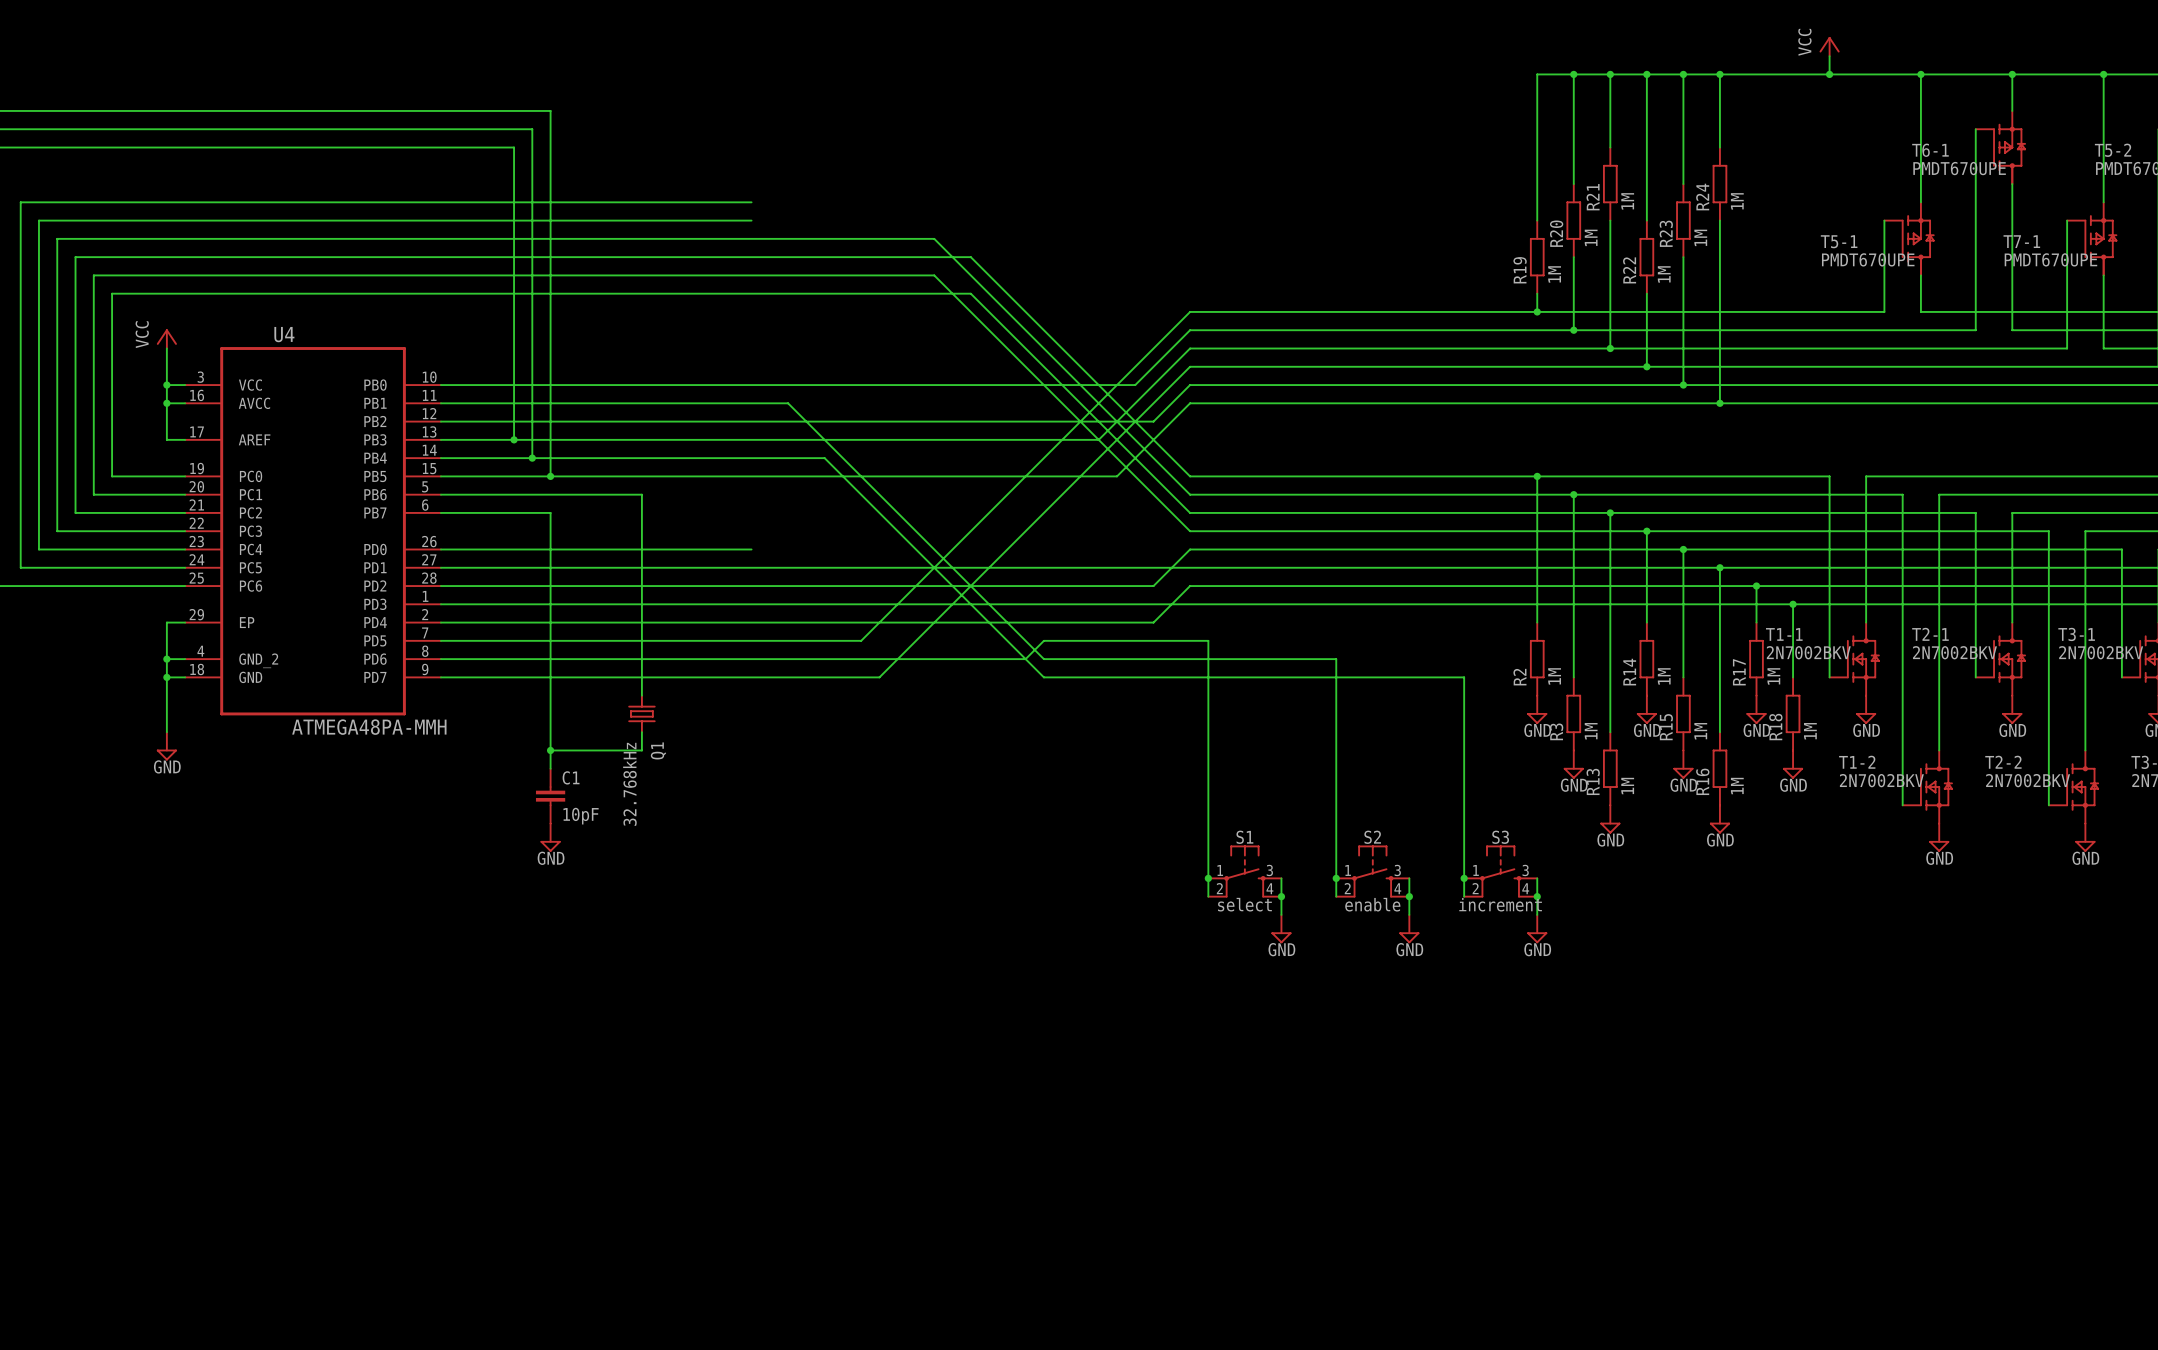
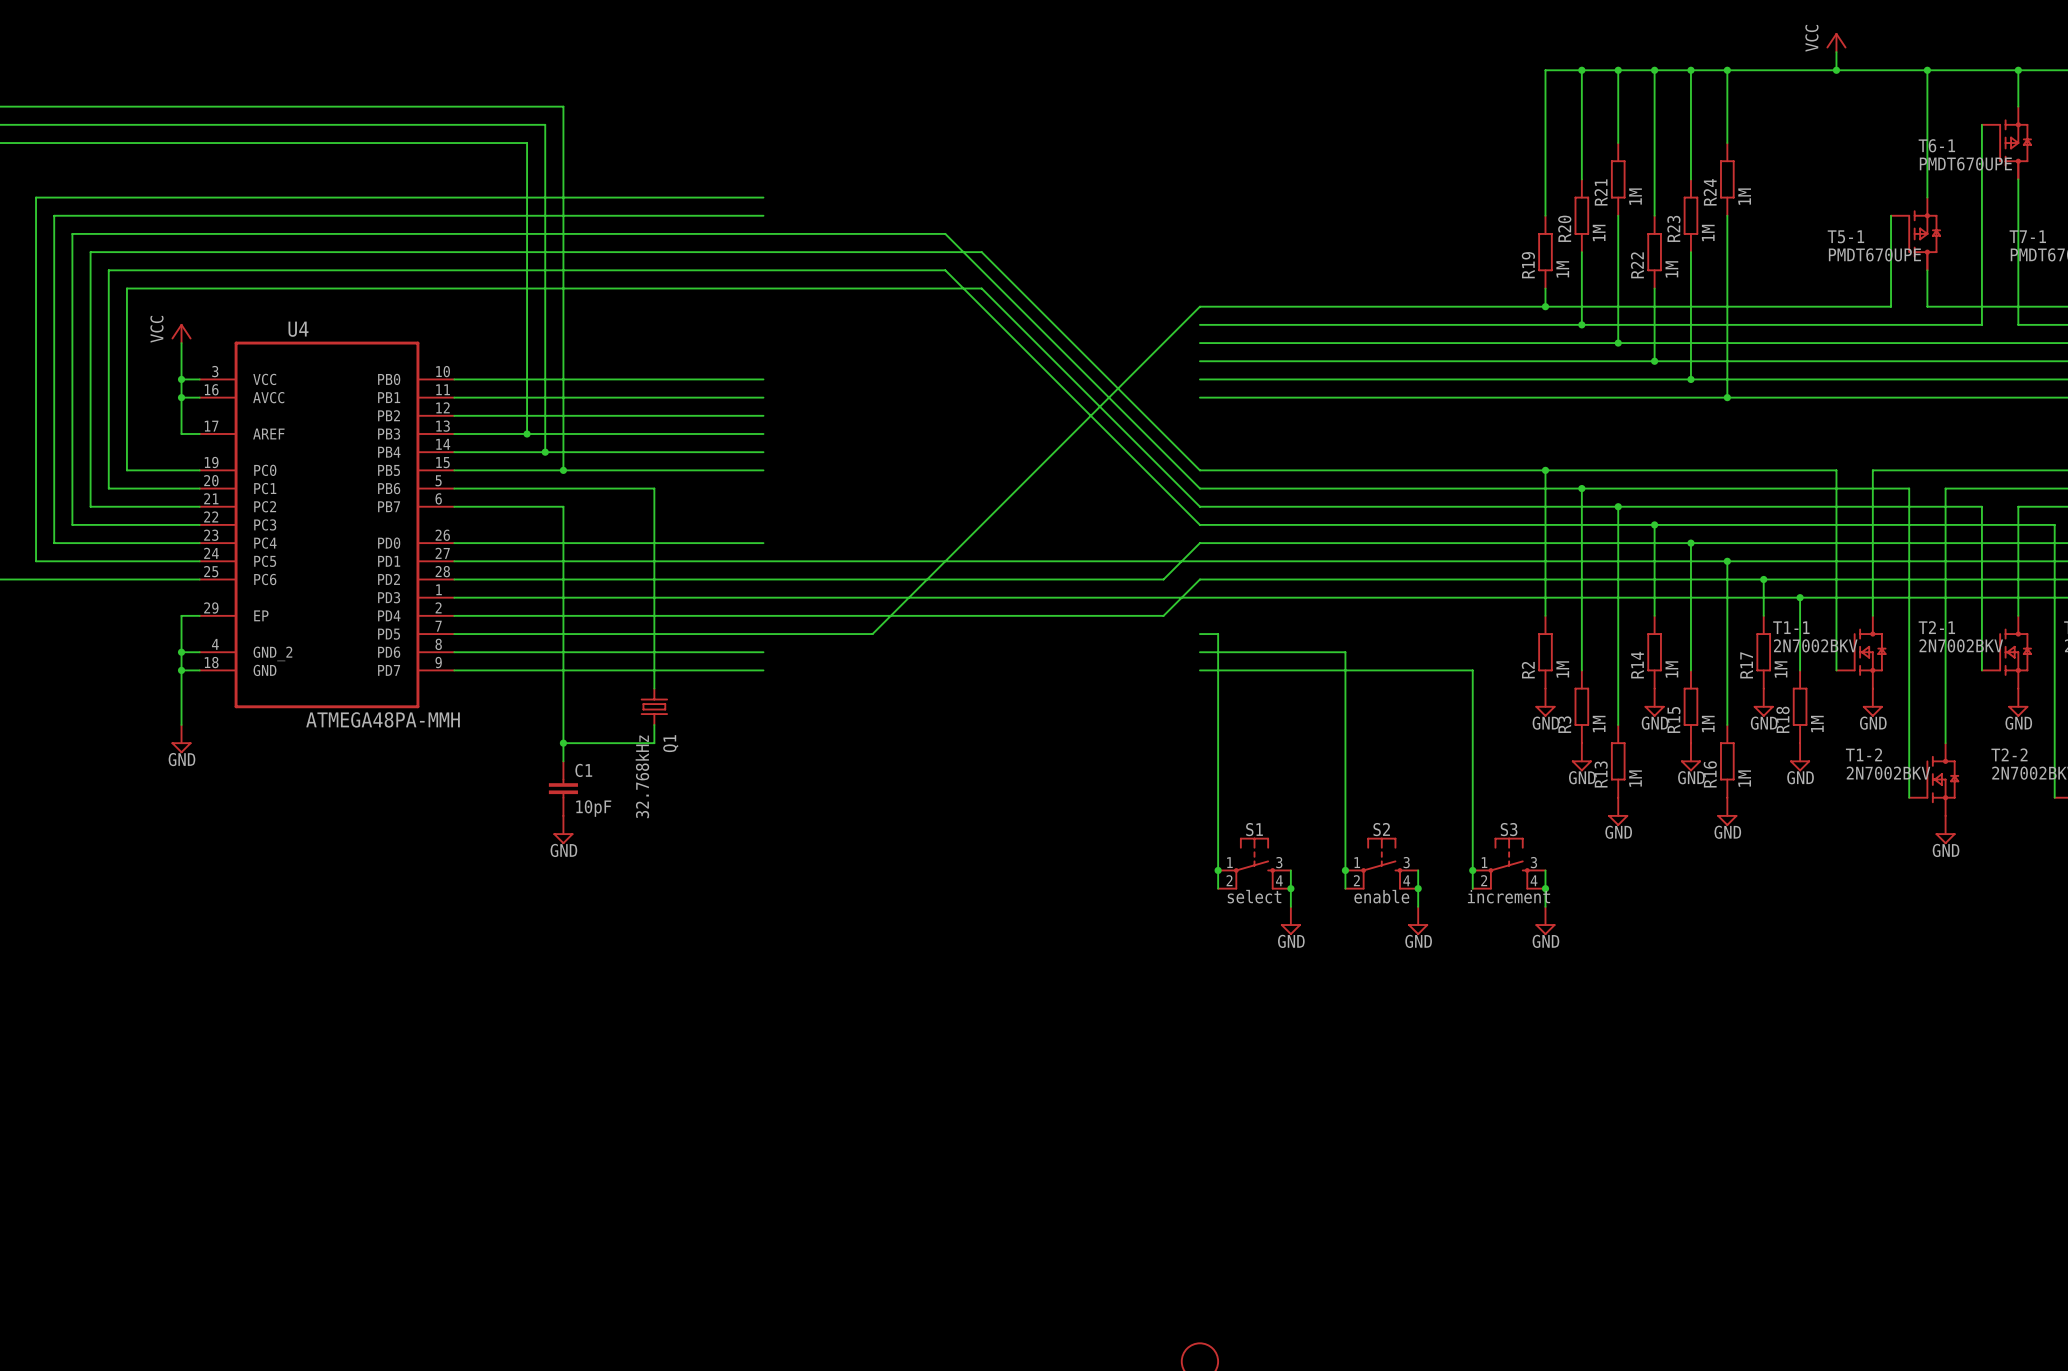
wire: (1190, 330) (1135, 385) (751, 385) -> none
wire: (1190, 348) (1098, 439) (751, 439) -> none
wire: (1190, 366) (879, 677) (751, 677) -> none
wire: (1190, 385) (1153, 421) (751, 421) -> none
wire: (751, 403) (788, 403) (1043, 659) (1190, 659) -> none
wire: (1190, 403) (1117, 476) (751, 476) -> none
wire: (751, 458) (824, 458) (1043, 677) (1190, 677) -> none
wire: (1190, 640) (1043, 640) (1025, 659) (751, 659) -> none

